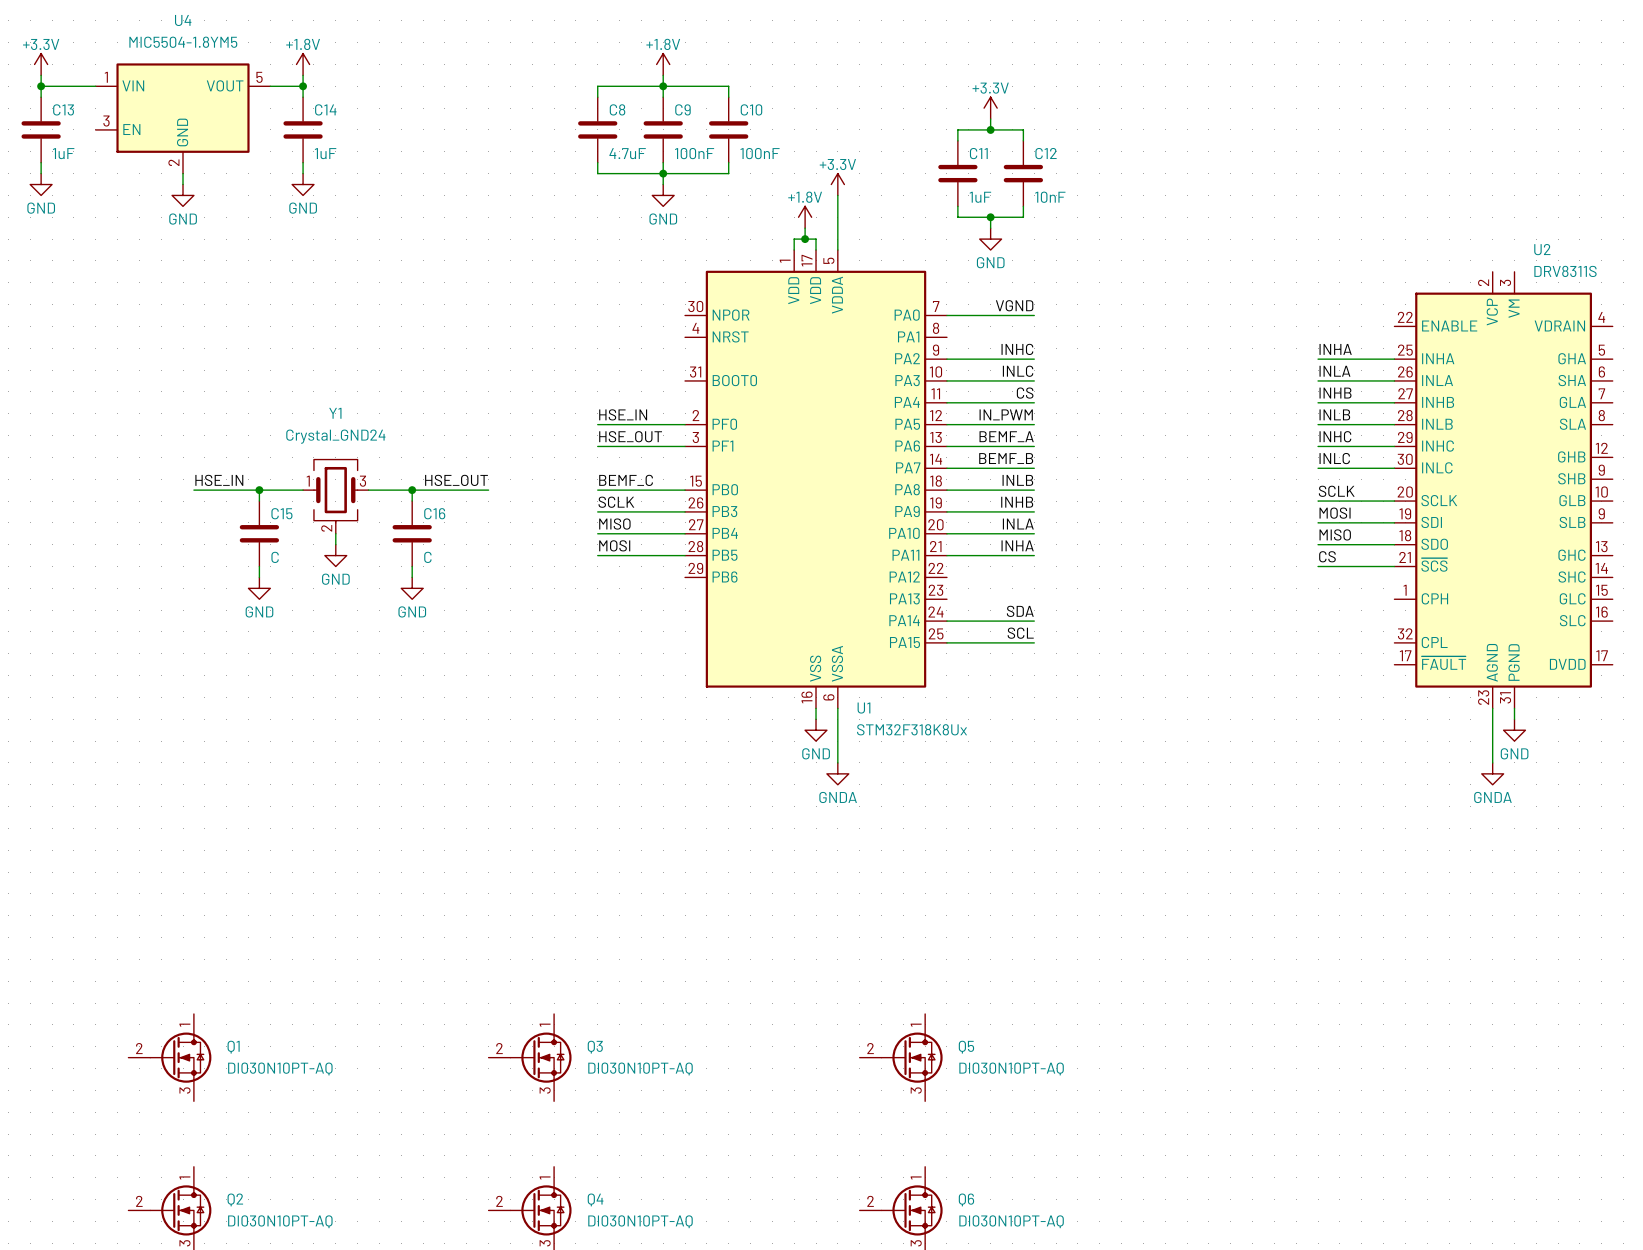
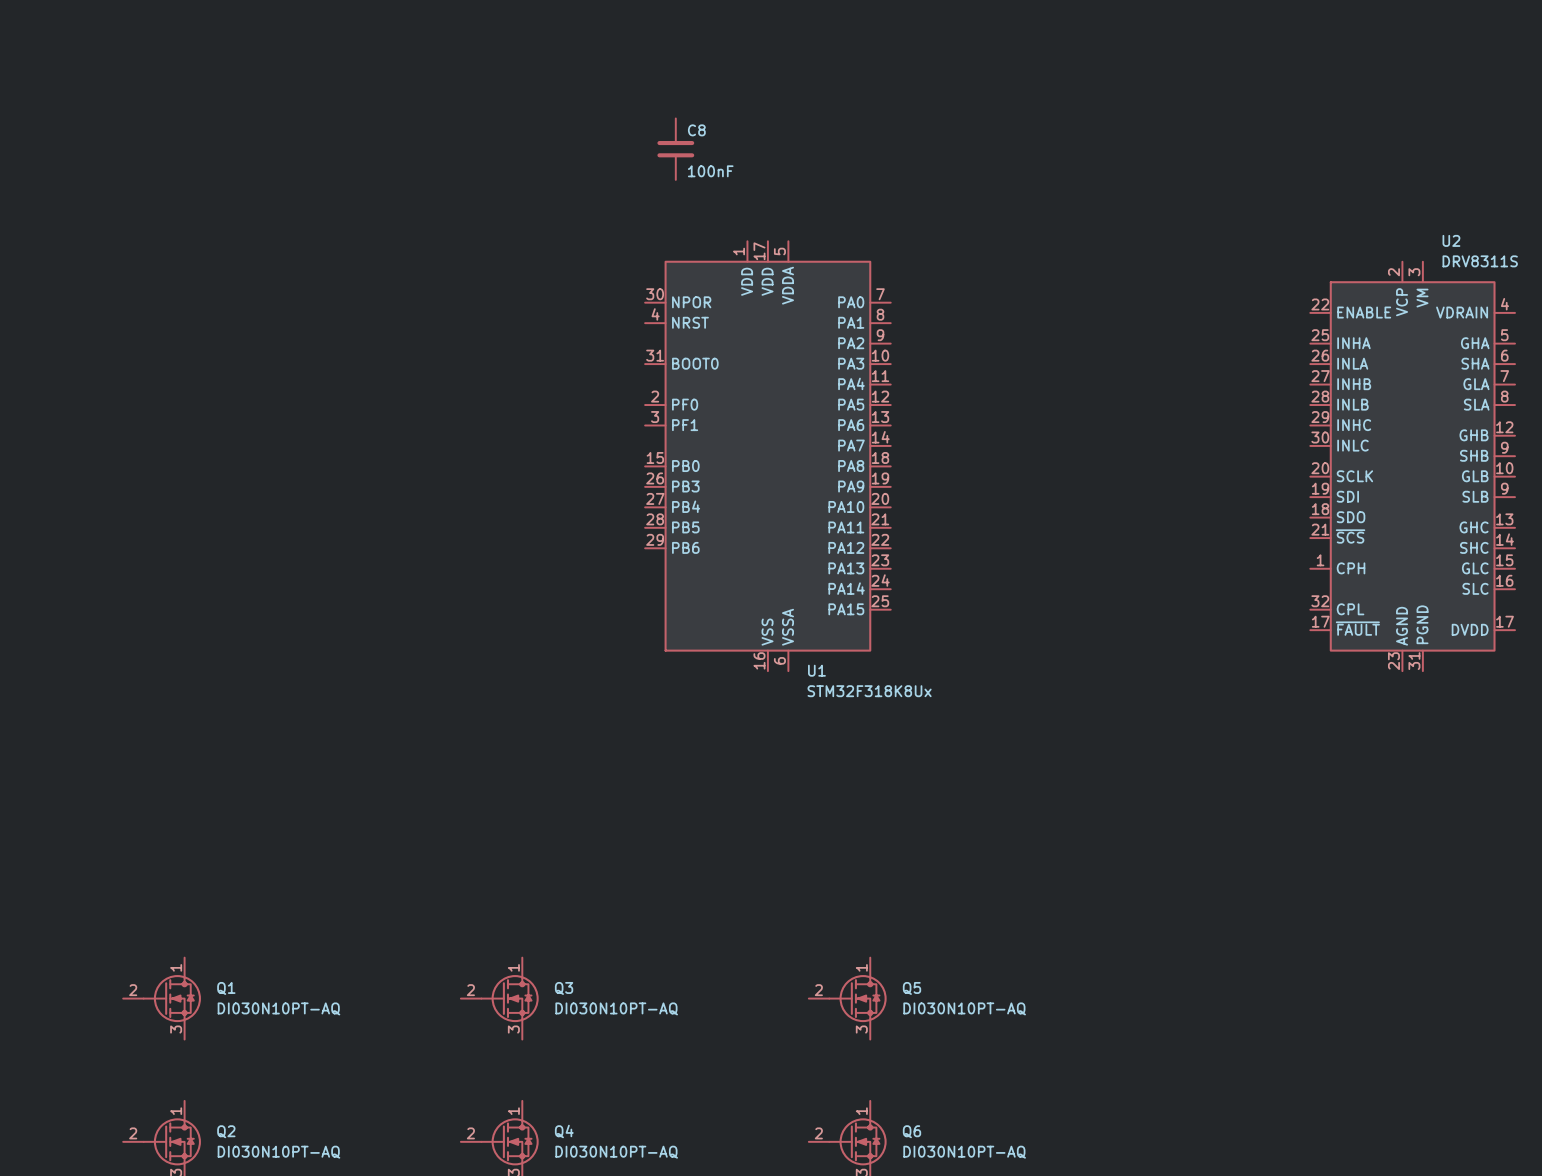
power symbol: +3.3V (41, 64) -> none
power symbol: +1.8V (303, 64) -> none
power symbol: +1.8V (663, 64) -> none
wire: (41, 75) (41, 97) -> none
wire: (303, 75) (303, 97) -> none
wire: (663, 75) (663, 97) -> none
wire: (41, 86) (95, 86) -> none
junction: (41, 86) -> none
wire: (270, 86) (303, 86) -> none
junction: (303, 86) -> none
junction: (663, 86) -> none
wire: (597, 97) (597, 86) (728, 86) (728, 97) -> none
power symbol: +3.3V (990, 108) -> none
U4: MIC5504-1.8YM5 (183, 118) -> none
wire: (990, 119) (990, 129) -> none
C13: 1uF (41, 129) -> none
C14: 1uF (303, 129) -> none
C8 position: (597, 129) -> (675, 149)
C9: 100nF (663, 129) -> none
C10: 100nF (728, 129) -> none
junction: (990, 129) -> none
wire: (957, 140) (957, 129) (1023, 129) (1023, 140) -> none
C8 value: 4.7uF (627, 153) -> 100nF (710, 171)
wire: (41, 162) (41, 173) -> none
wire: (303, 162) (303, 173) -> none
wire: (597, 162) (597, 173) (728, 173) (728, 162) -> none
wire: (663, 162) (663, 184) -> none
wire: (183, 173) (183, 184) -> none
junction: (663, 173) -> none
C11: 1uF (957, 173) -> none
C12: 10nF (1023, 173) -> none
power symbol: GND (41, 184) -> none
power symbol: GND (303, 184) -> none
power symbol: +3.3V (837, 184) -> none
power symbol: GND (183, 195) -> none
power symbol: GND (663, 195) -> none
wire: (837, 195) (837, 250) -> none
wire: (957, 206) (957, 217) (1023, 217) (1023, 206) -> none
power symbol: +1.8V (805, 217) -> none
wire: (990, 217) (990, 228) -> none
junction: (990, 217) -> none
wire: (805, 228) (805, 239) -> none
junction: (805, 239) -> none
power symbol: GND (990, 239) -> none
wire: (794, 250) (794, 239) (816, 239) (816, 250) -> none
label: VGND (1014, 305) -> none
wire: (946, 315) (1034, 315) -> none
label: INHC (1017, 349) -> none
label: INHA (1335, 349) -> none
wire: (946, 359) (1034, 359) -> none
wire: (1318, 359) (1394, 359) -> none
label: INLC (1018, 371) -> none
label: INLA (1334, 371) -> none
wire: (946, 380) (1034, 380) -> none
wire: (1318, 380) (1394, 380) -> none
label: CS (1025, 393) -> none
label: INHB (1335, 393) -> none
wire: (946, 402) (1034, 402) -> none
wire: (1318, 402) (1394, 402) -> none
label: HSE_IN (623, 414) -> none
label: IN_PWM (1006, 414) -> none
label: INLB (1334, 414) -> none
wire: (597, 424) (685, 424) -> none
wire: (946, 424) (1034, 424) -> none
wire: (1318, 424) (1394, 424) -> none
label: HSE_OUT (630, 436) -> none
label: BEMF_A (1006, 436) -> none
label: INHC (1335, 436) -> none
wire: (597, 446) (685, 446) -> none
wire: (946, 446) (1034, 446) -> none
wire: (1318, 446) (1394, 446) -> none
label: BEMF_B (1006, 458) -> none
label: INLC (1334, 458) -> none
wire: (946, 468) (1034, 468) -> none
wire: (1318, 468) (1394, 468) -> none
label: HSE_IN (219, 480) -> none
label: HSE_OUT (456, 480) -> none
label: BEMF_C (626, 480) -> none
label: INLB (1017, 480) -> none
wire: (193, 490) (303, 490) -> none
wire: (259, 490) (259, 501) -> none
junction: (259, 490) -> none
wire: (368, 490) (488, 490) -> none
wire: (412, 490) (412, 501) -> none
junction: (412, 490) -> none
wire: (597, 490) (685, 490) -> none
wire: (946, 490) (1034, 490) -> none
label: SCLK (1336, 491) -> none
Y1: Crystal_GND24 (335, 496) -> none
wire: (1318, 501) (1394, 501) -> none
label: SCLK (616, 502) -> none
label: INHB (1017, 502) -> none
wire: (597, 511) (685, 511) -> none
wire: (946, 511) (1034, 511) -> none
label: MOSI (1335, 513) -> none
wire: (1318, 522) (1394, 522) -> none
label: MISO (614, 524) -> none
label: INLA (1018, 524) -> none
C15: C (259, 533) -> none
wire: (335, 533) (335, 544) -> none
C16: C (412, 533) -> none
wire: (597, 533) (685, 533) -> none
wire: (946, 533) (1034, 533) -> none
label: MISO (1335, 534) -> none
wire: (1318, 544) (1394, 544) -> none
label: MOSI (614, 545) -> none
label: INHA (1017, 545) -> none
power symbol: GND (335, 555) -> none
wire: (597, 555) (685, 555) -> none
wire: (946, 555) (1034, 555) -> none
label: CS (1327, 556) -> none
wire: (259, 566) (259, 577) -> none
wire: (412, 566) (412, 577) -> none
wire: (1318, 566) (1394, 566) -> none
power symbol: GND (259, 588) -> none
power symbol: GND (412, 588) -> none
label: SDA (1020, 611) -> none
wire: (946, 621) (1034, 621) -> none
label: SCL (1020, 633) -> none
wire: (946, 642) (1034, 642) -> none
wire: (816, 708) (816, 719) -> none
wire: (837, 708) (837, 762) -> none
wire: (1492, 708) (1492, 762) -> none
wire: (1514, 708) (1514, 719) -> none
power symbol: GND (816, 730) -> none
power symbol: GND (1514, 730) -> none
power symbol: GNDA (837, 773) -> none
power symbol: GNDA (1492, 773) -> none

